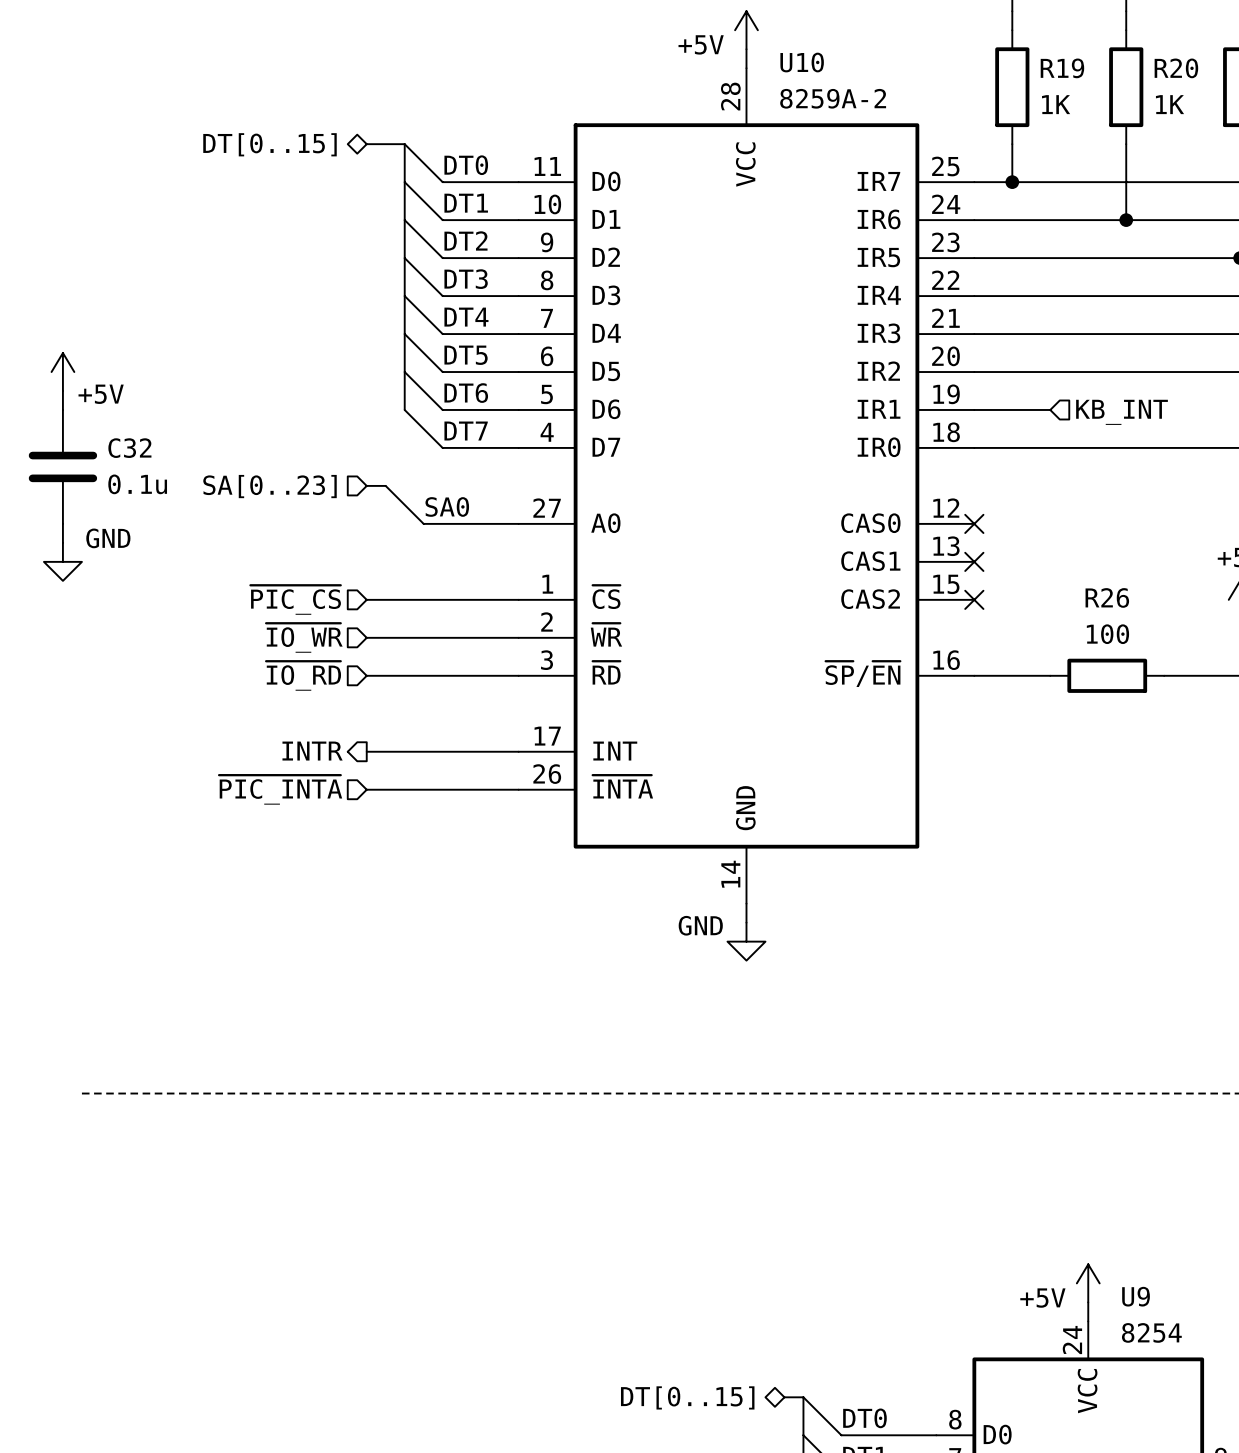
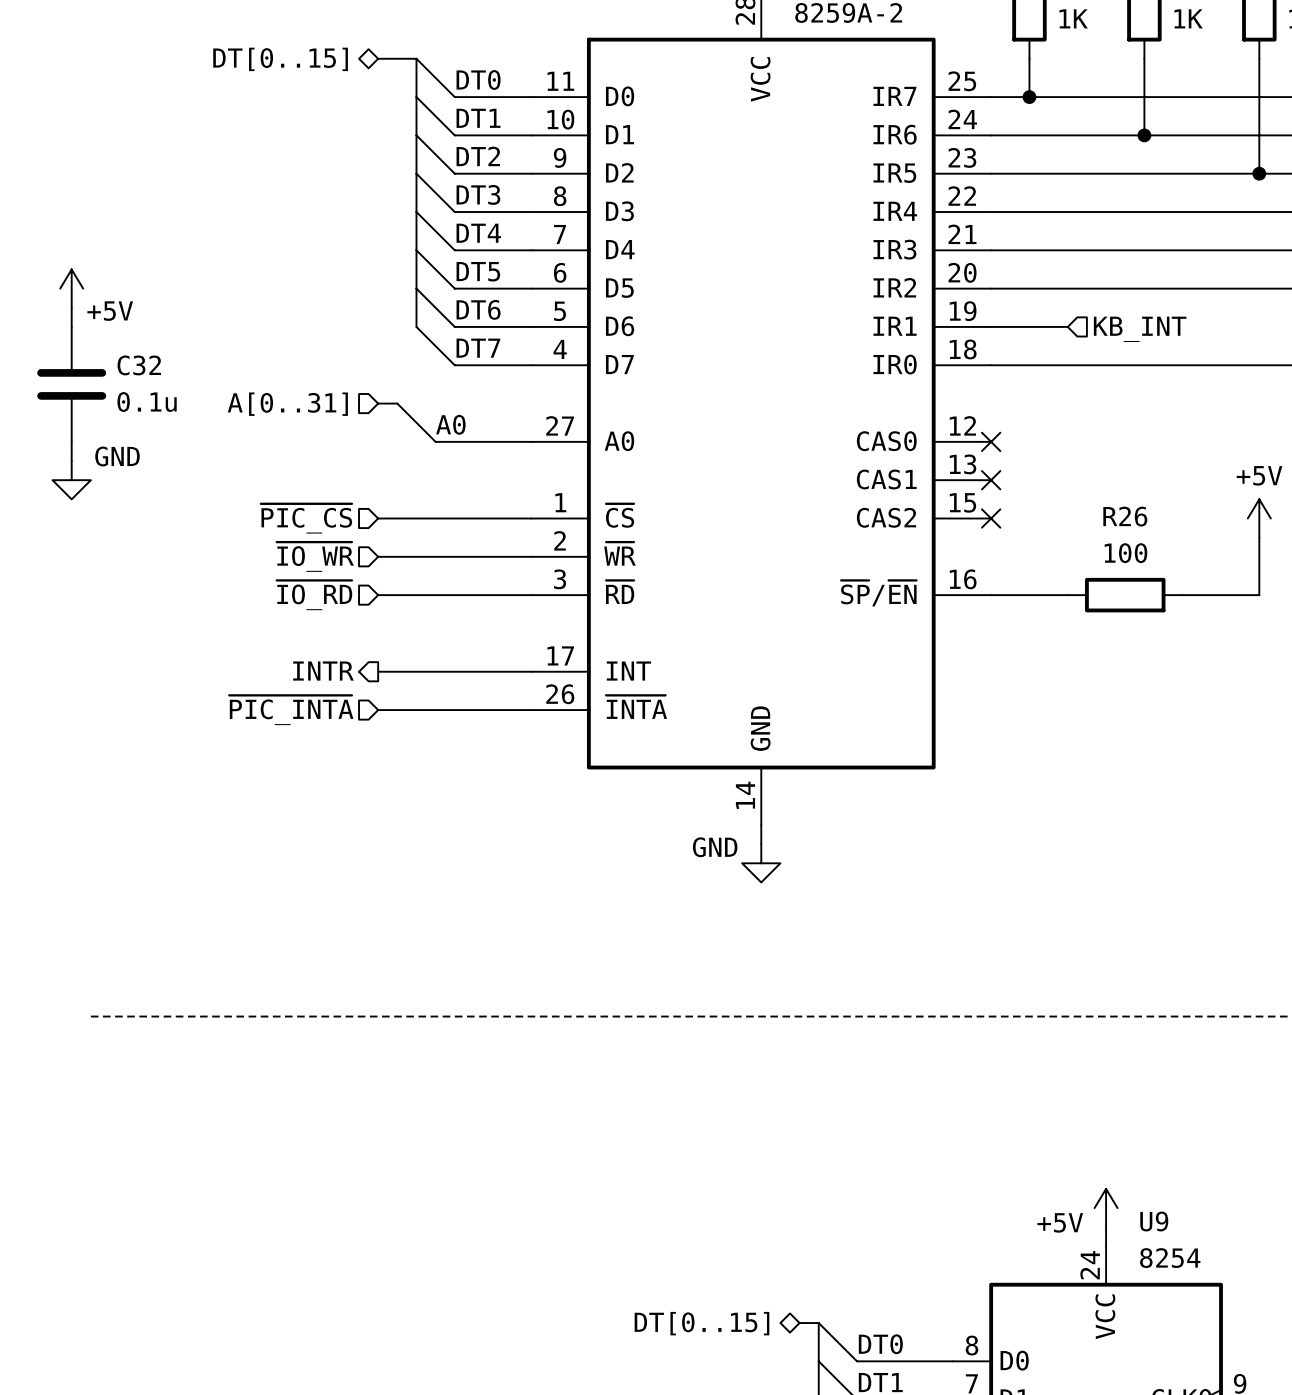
hierarchical label: SA[0..23] (270, 486) -> A[0..31] (287, 404)
label: SA0 (447, 506) -> A0 (450, 424)

